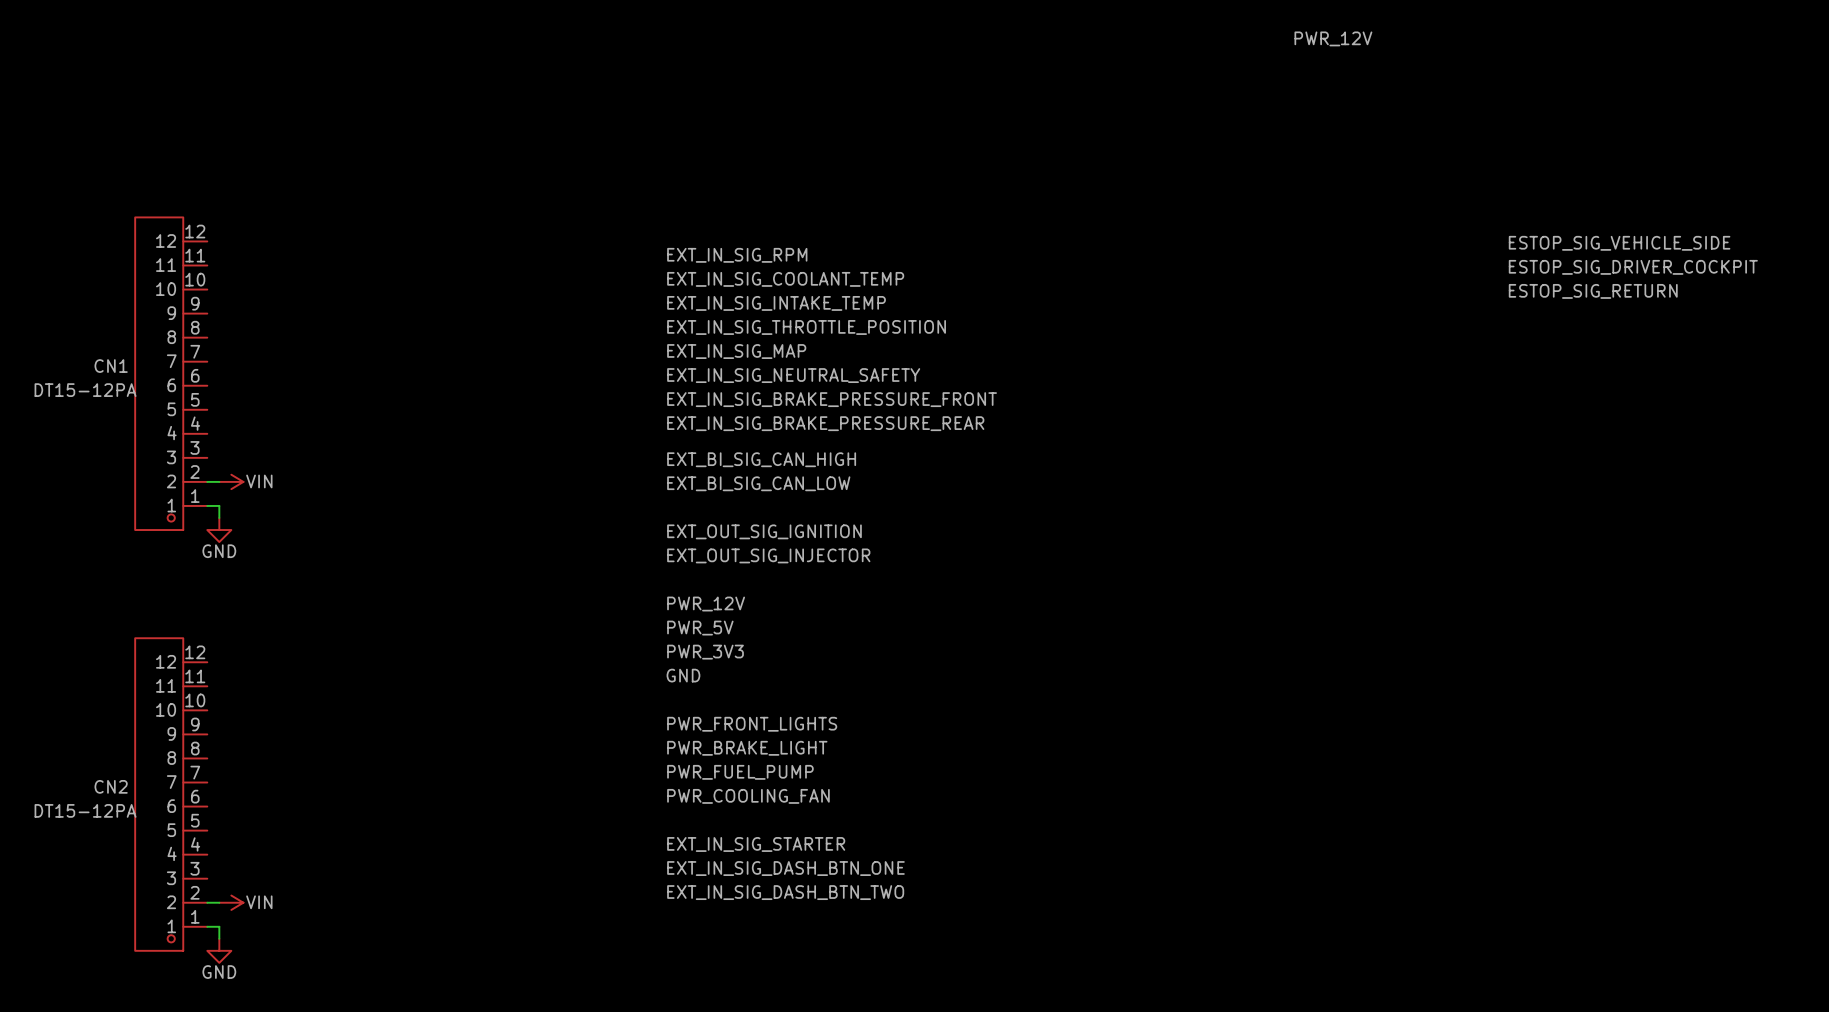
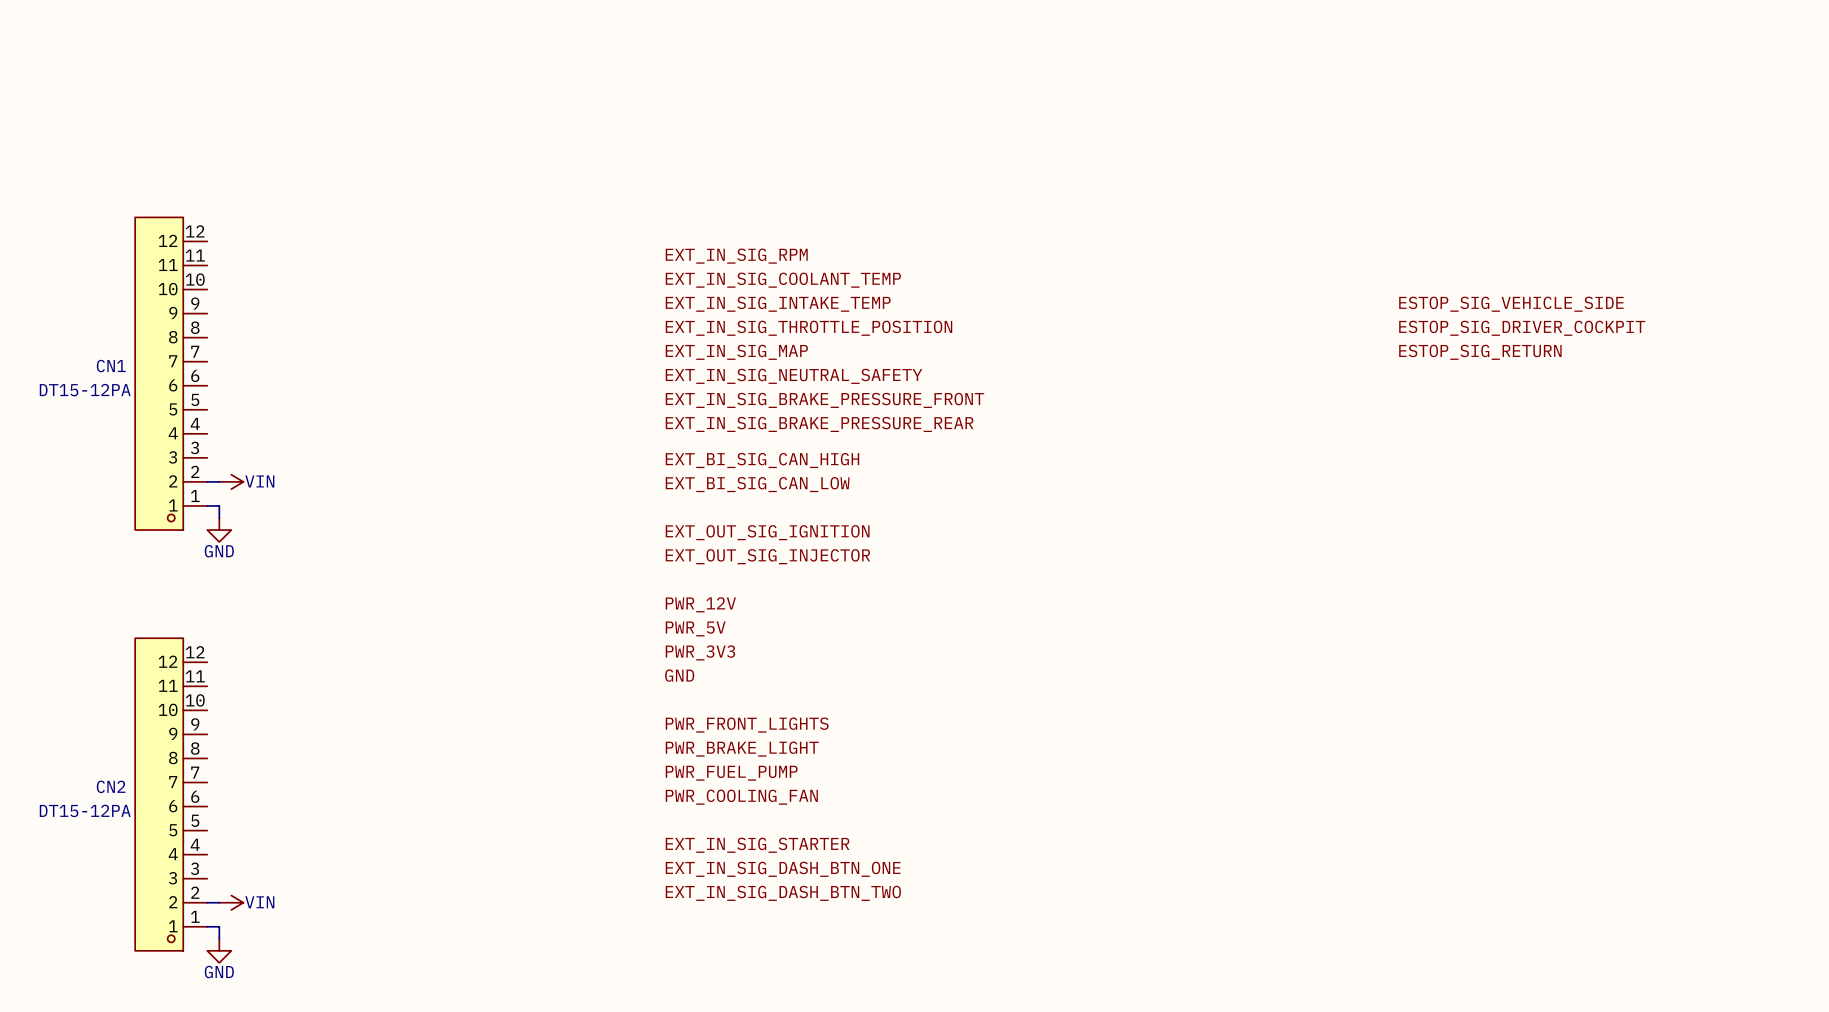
label: PWR_12V (1333, 38) -> none
label position: ESTOP_SIG_VEHICLE_SIDE (1619, 243) -> ESTOP_SIG_VEHICLE_SIDE (1511, 304)
label position: ESTOP_SIG_DRIVER_COCKPIT (1633, 267) -> ESTOP_SIG_DRIVER_COCKPIT (1522, 328)
label position: ESTOP_SIG_RETURN (1593, 291) -> ESTOP_SIG_RETURN (1480, 352)

